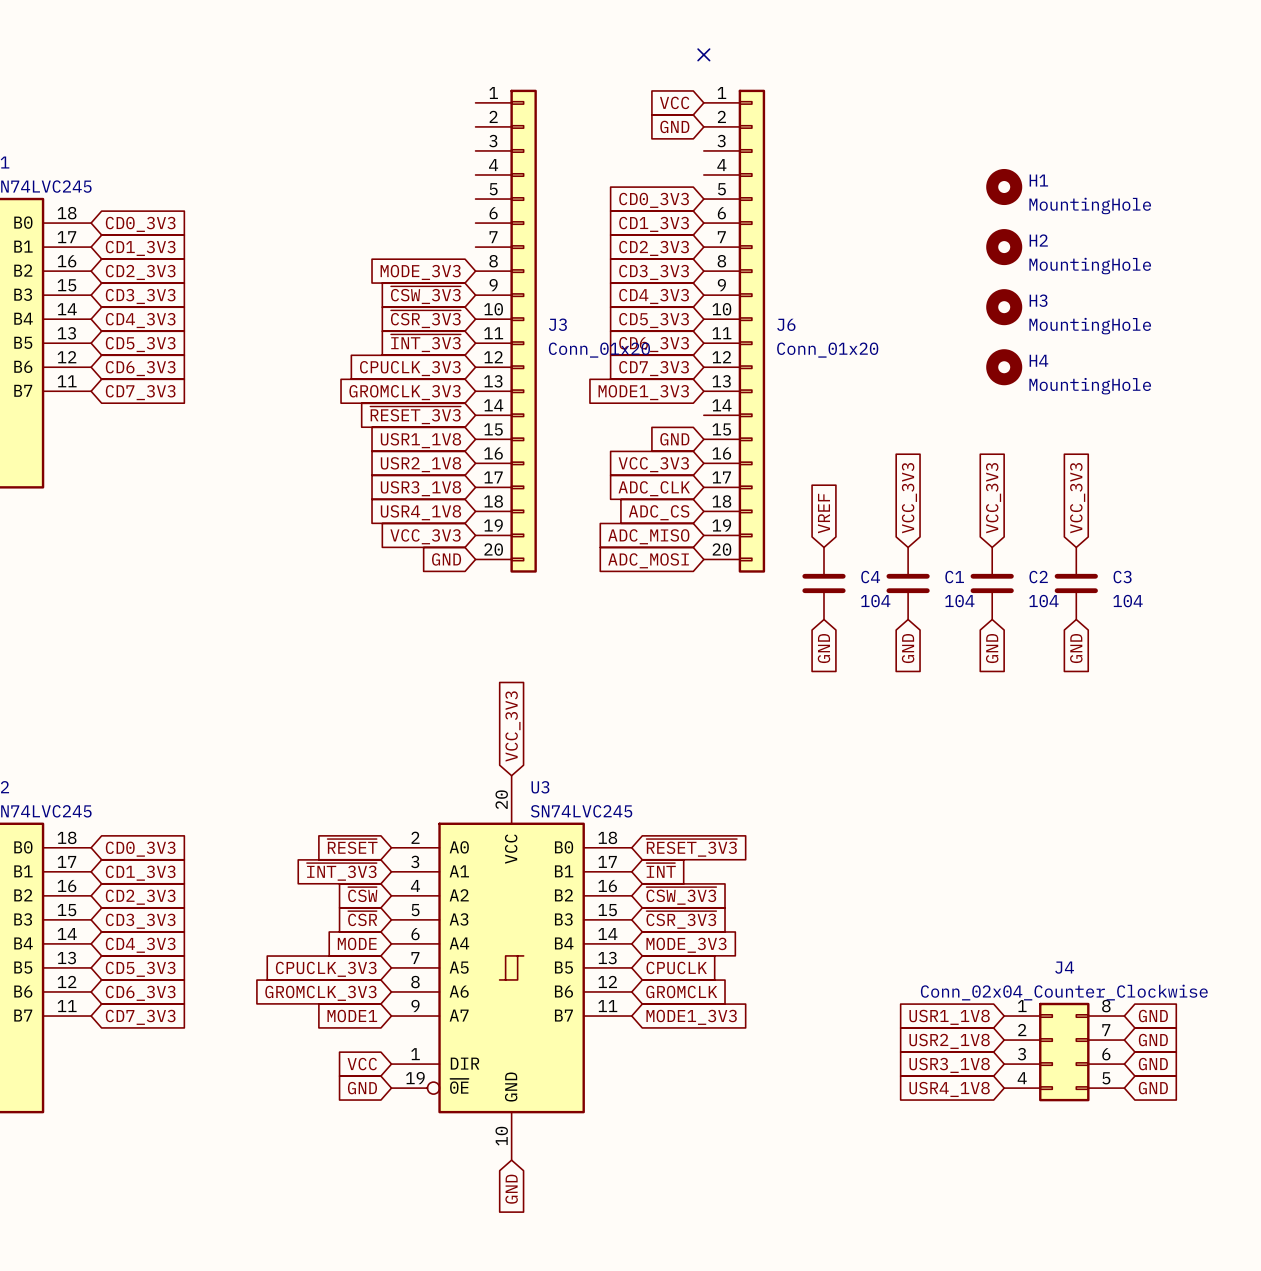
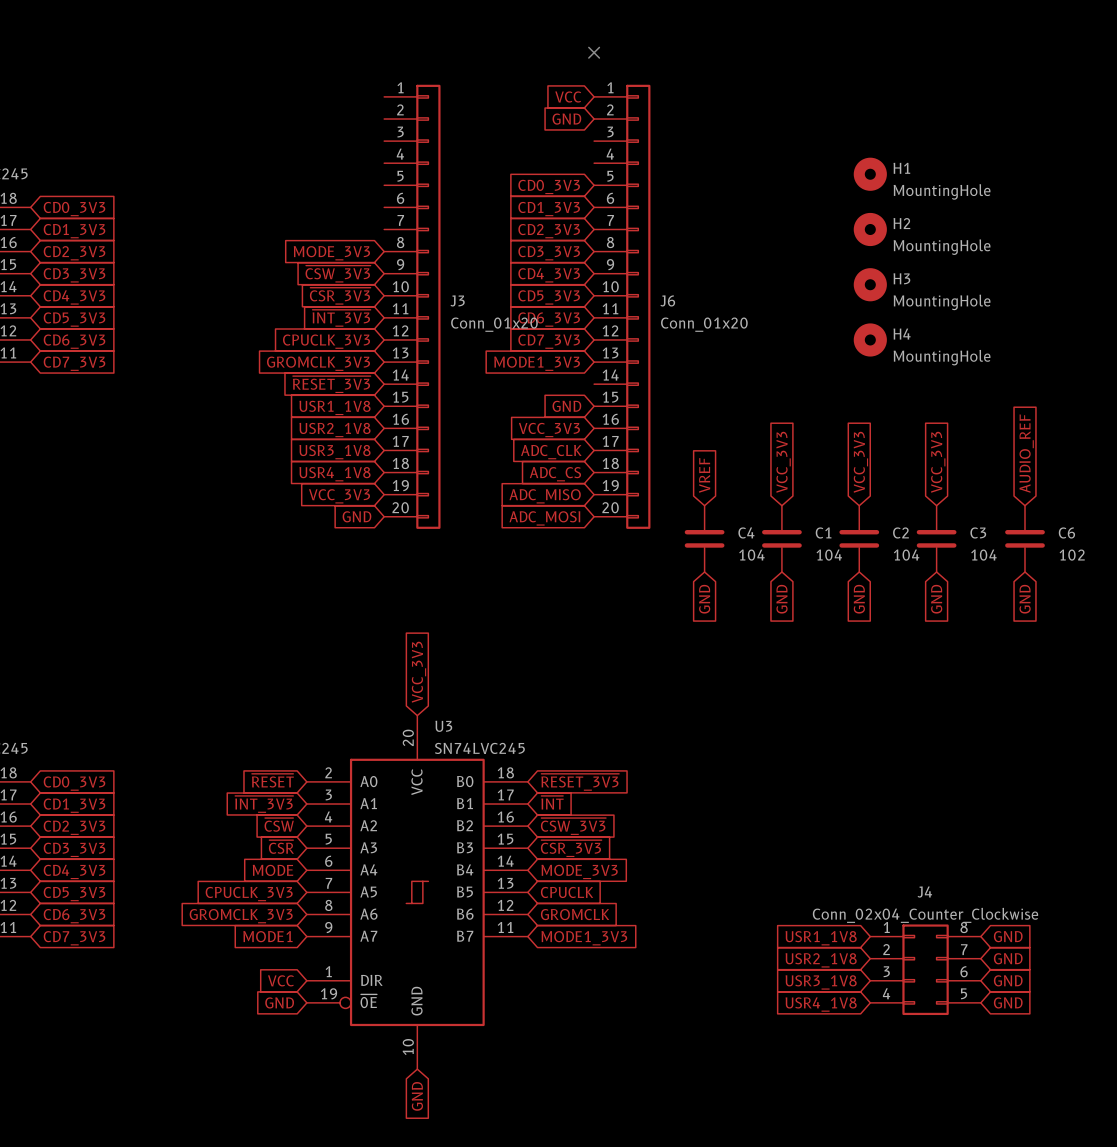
global label: none -> AUDIO_REF (1026, 453)
C6: none -> 102 (1025, 538)
global label: none -> GND (1025, 599)

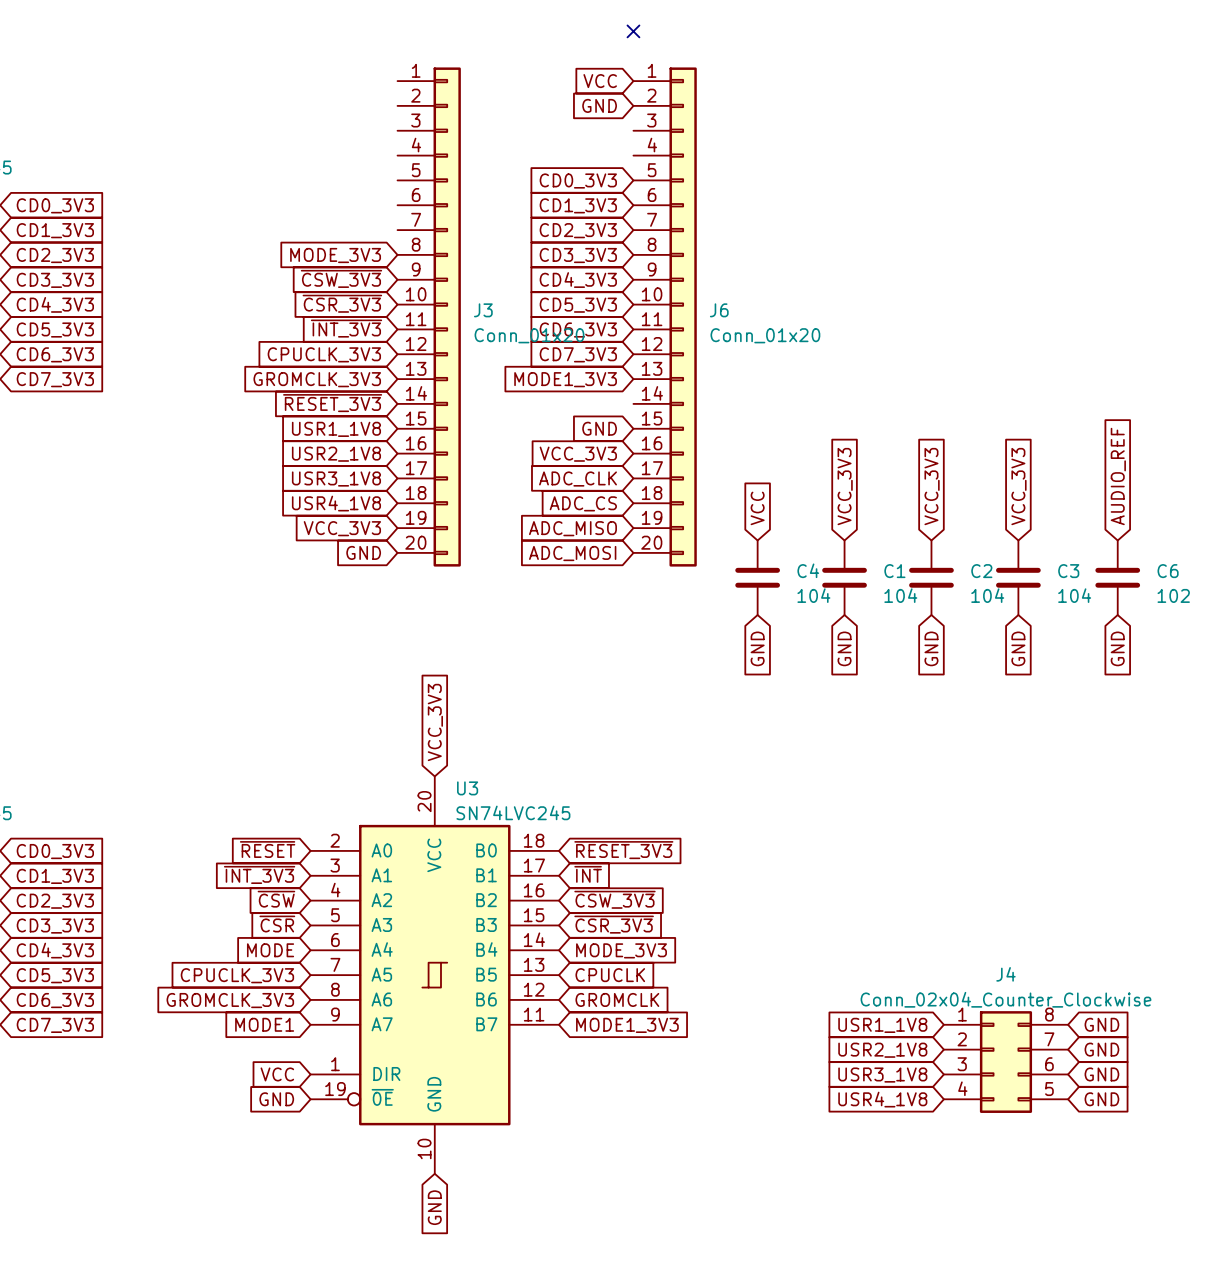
H1: MountingHole (870, 174) -> none
H2: MountingHole (870, 229) -> none
H3: MountingHole (870, 284) -> none
H4: MountingHole (870, 339) -> none
global label: VREF (704, 475) -> VCC (757, 508)

